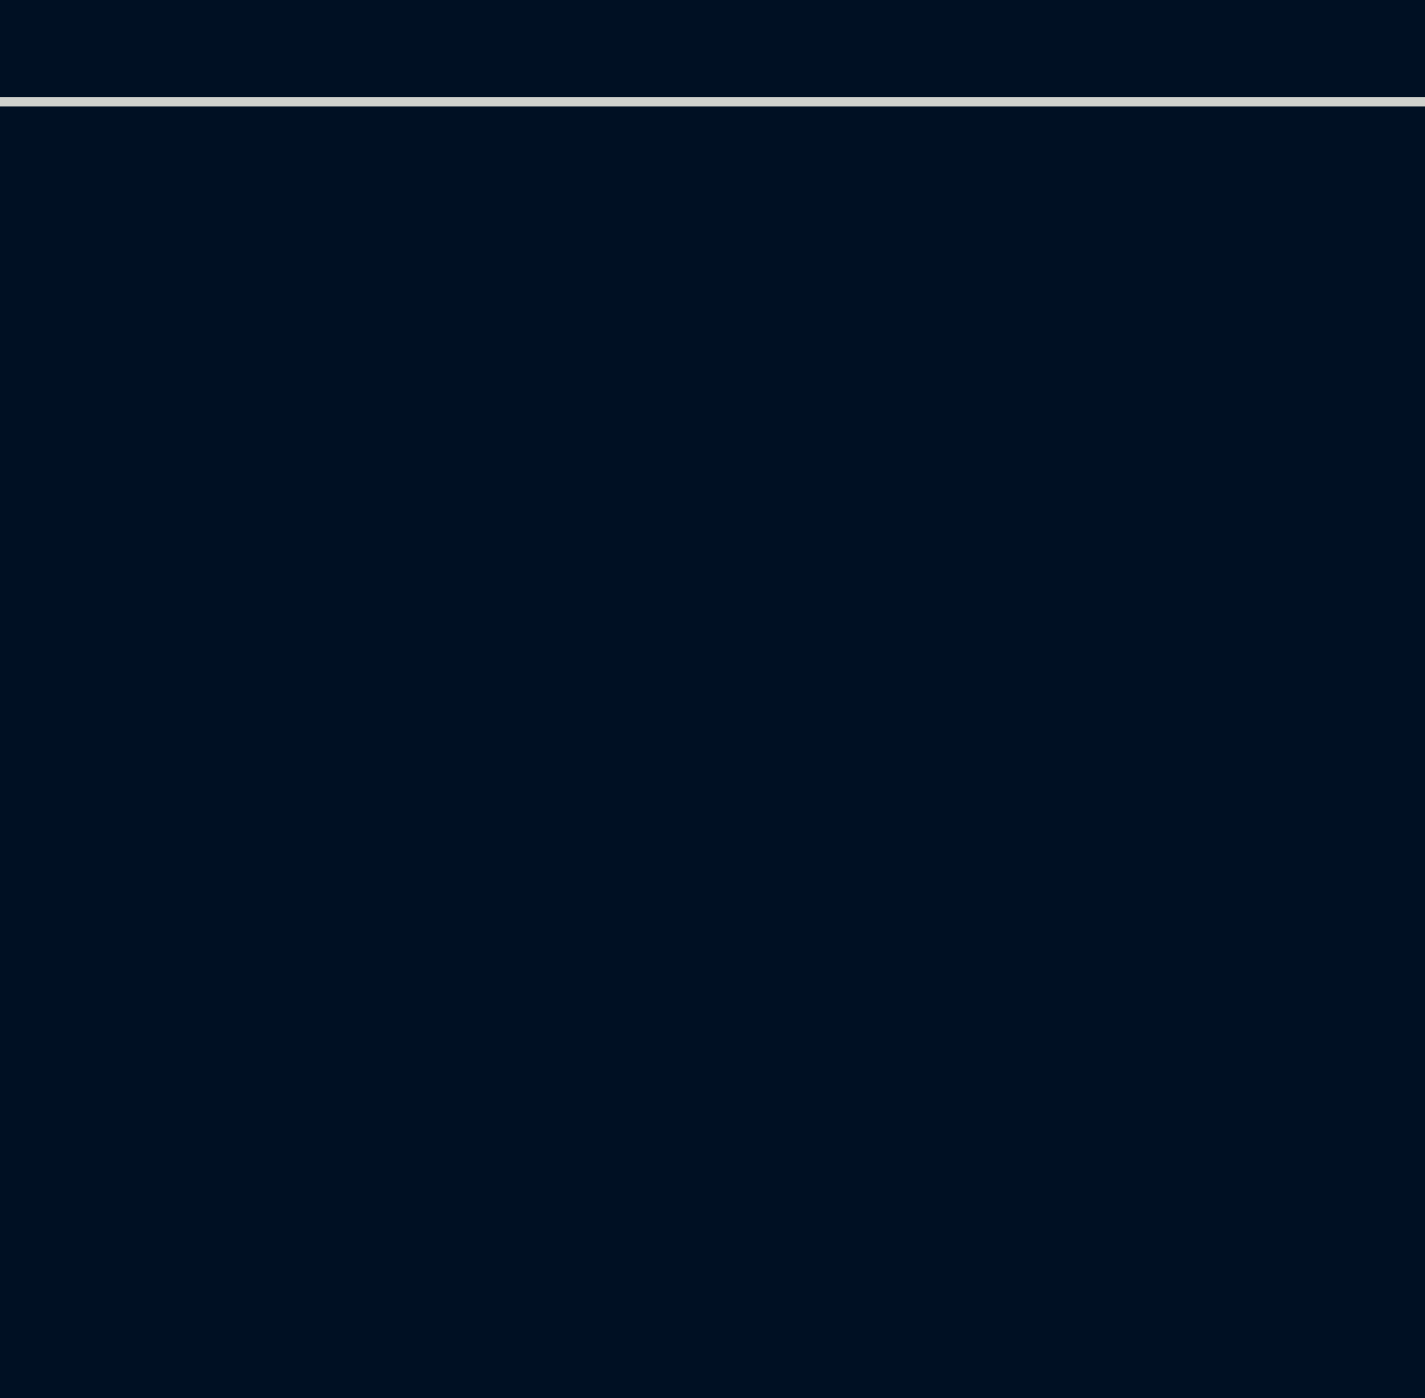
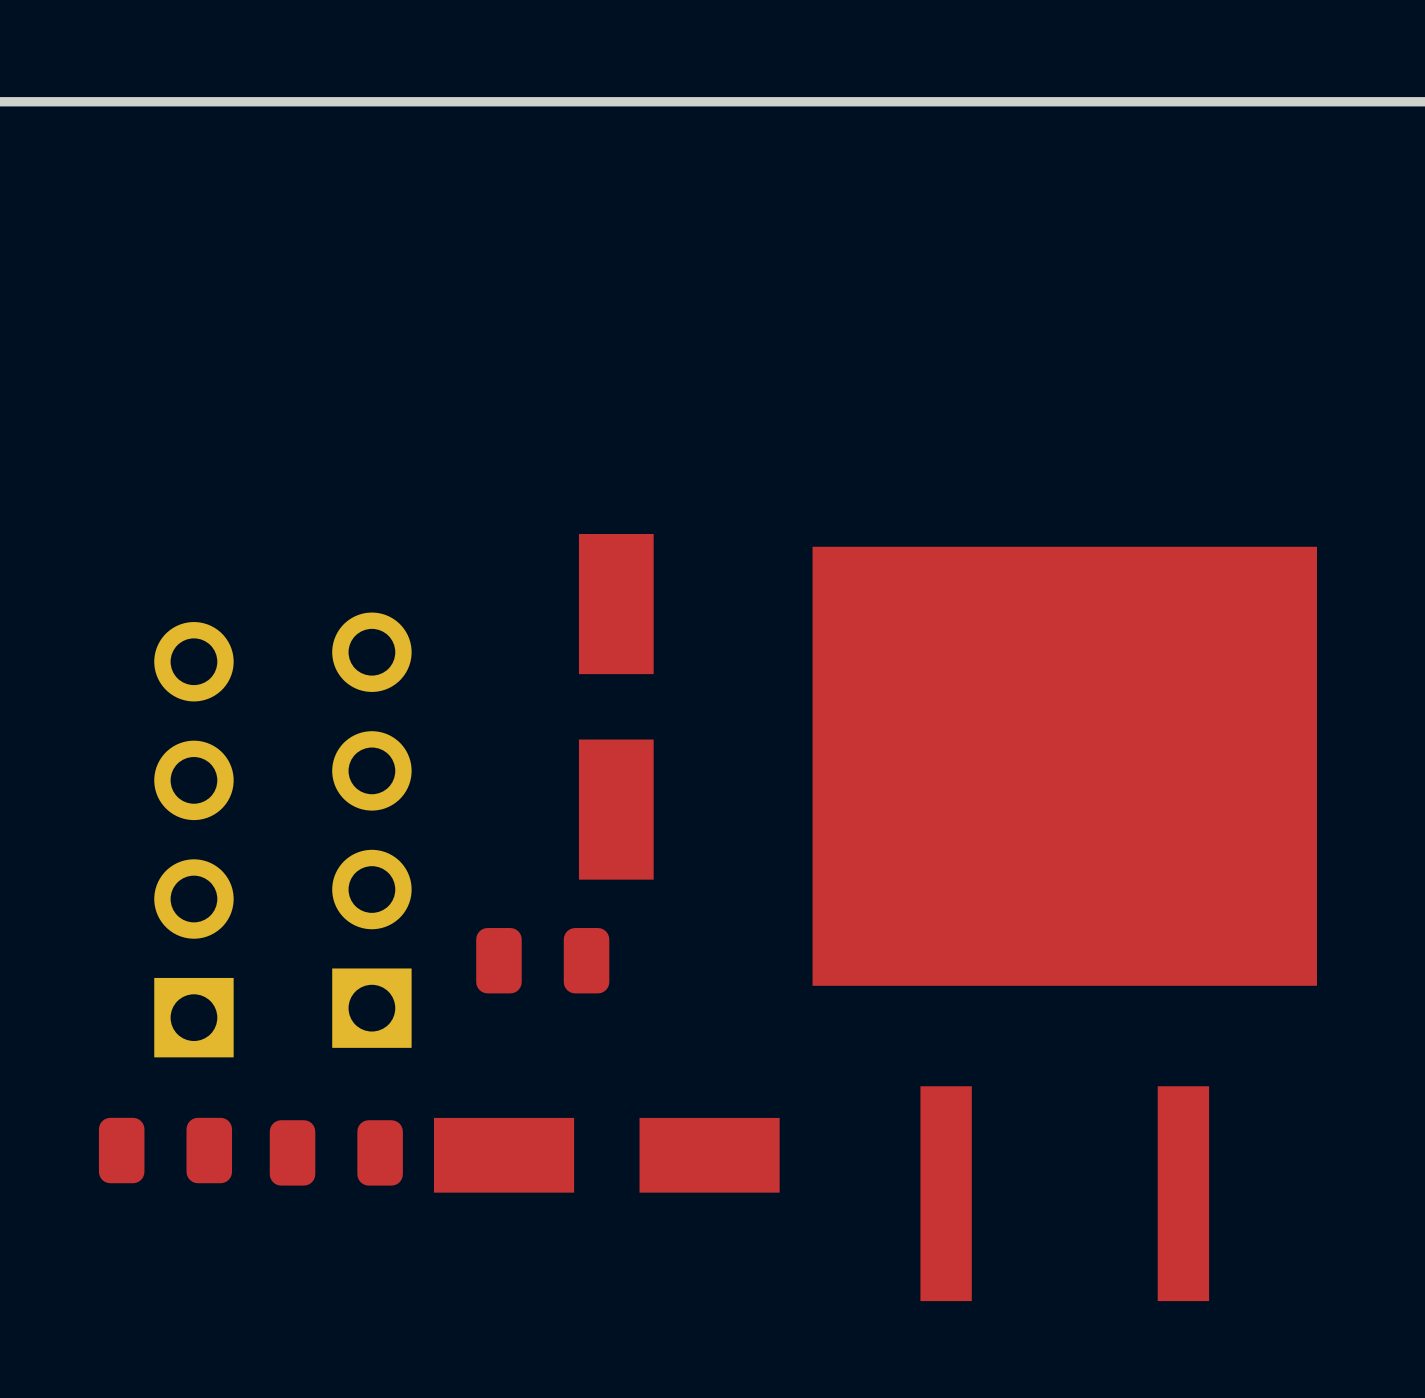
part: none -> (616, 706)
part: none -> (371, 830)
part: none -> (193, 839)
part: none -> (1064, 923)
part: none -> (542, 960)
part: none -> (165, 1150)
part: none -> (336, 1152)
part: none -> (606, 1155)

